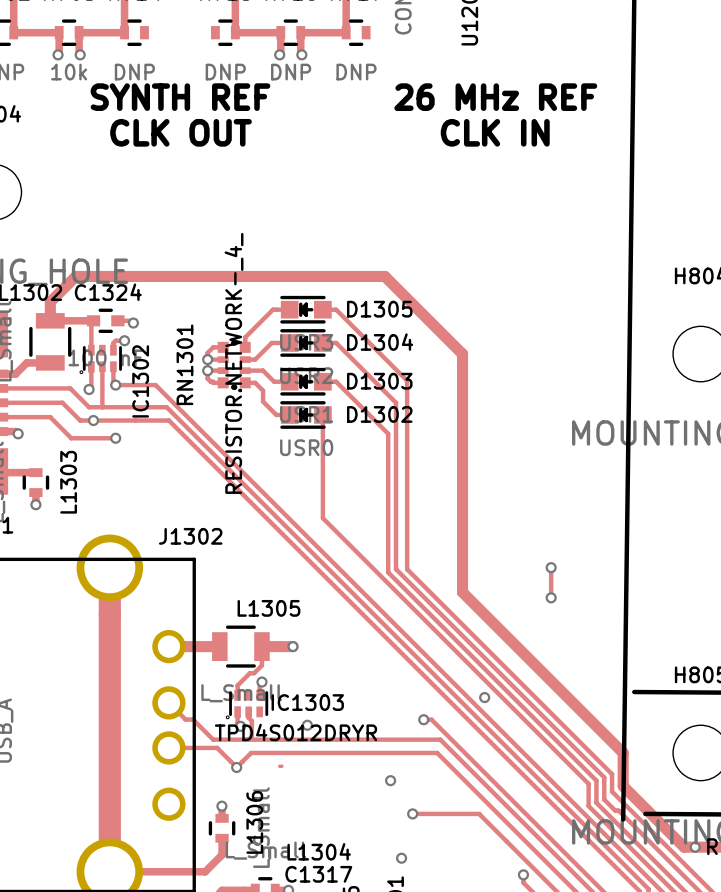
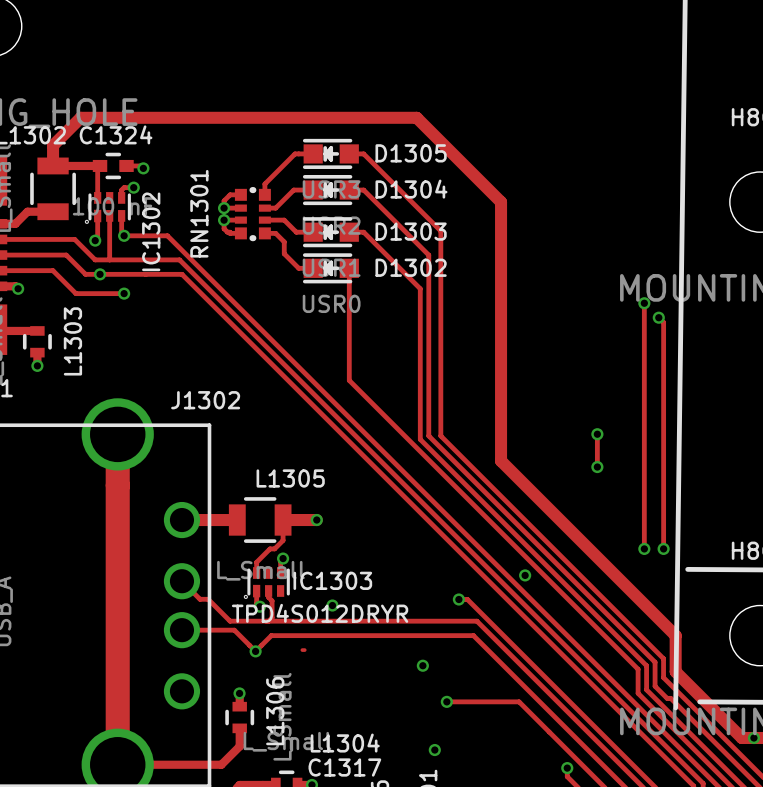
RN1301 value: RESISTOR.NETWORK-_4_ (234, 363) -> none
track: none -> (644, 303) (644, 548)
via: none -> (644, 303)
track: none -> (658, 317) (663, 322) (663, 548)
via: none -> (658, 317)
via: none -> (644, 548)
via: none -> (663, 548)

